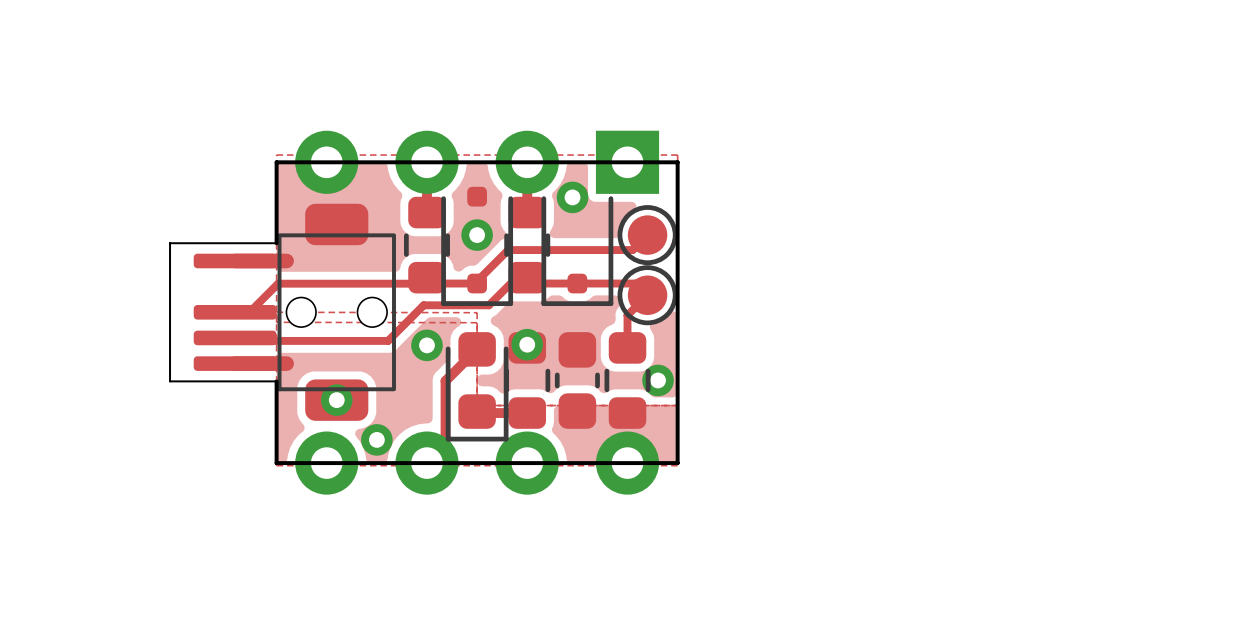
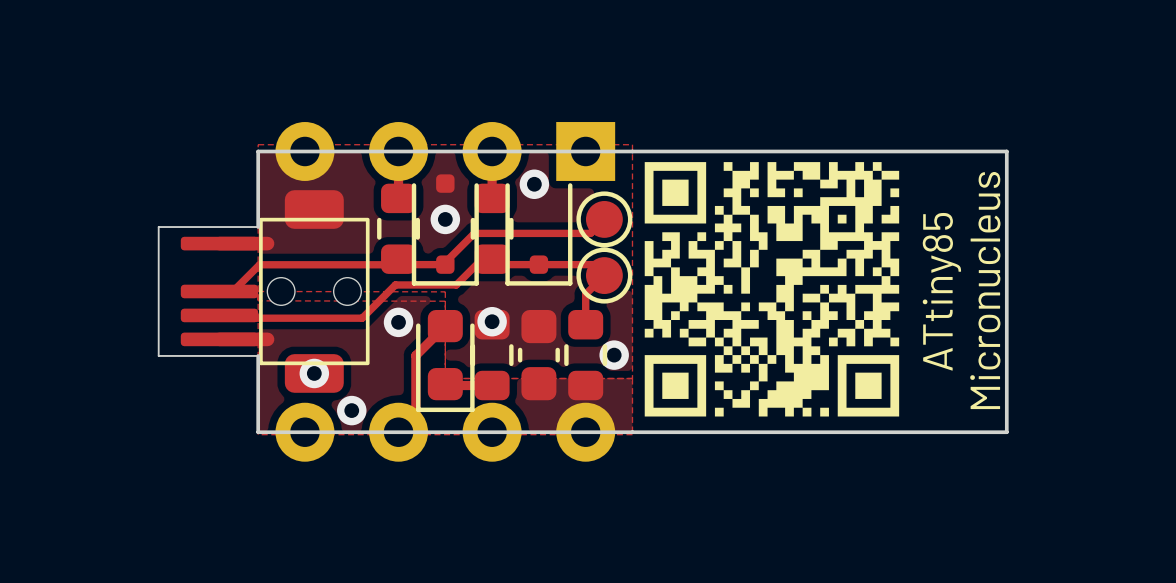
board edge: (677, 162) (677, 463) -> (632, 151) (1006, 151) (1006, 432) (632, 432)
drawing: none -> [644, 162, 900, 417]
text: none -> Micronucleus (985, 290)
text: none -> ATtiny85 (941, 291)

